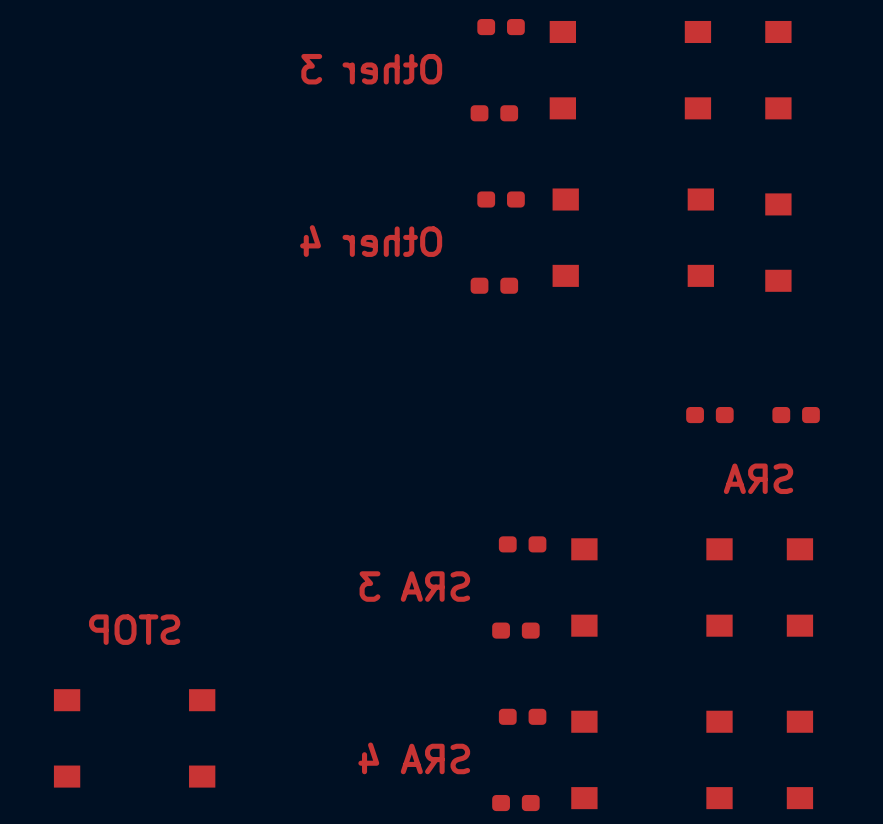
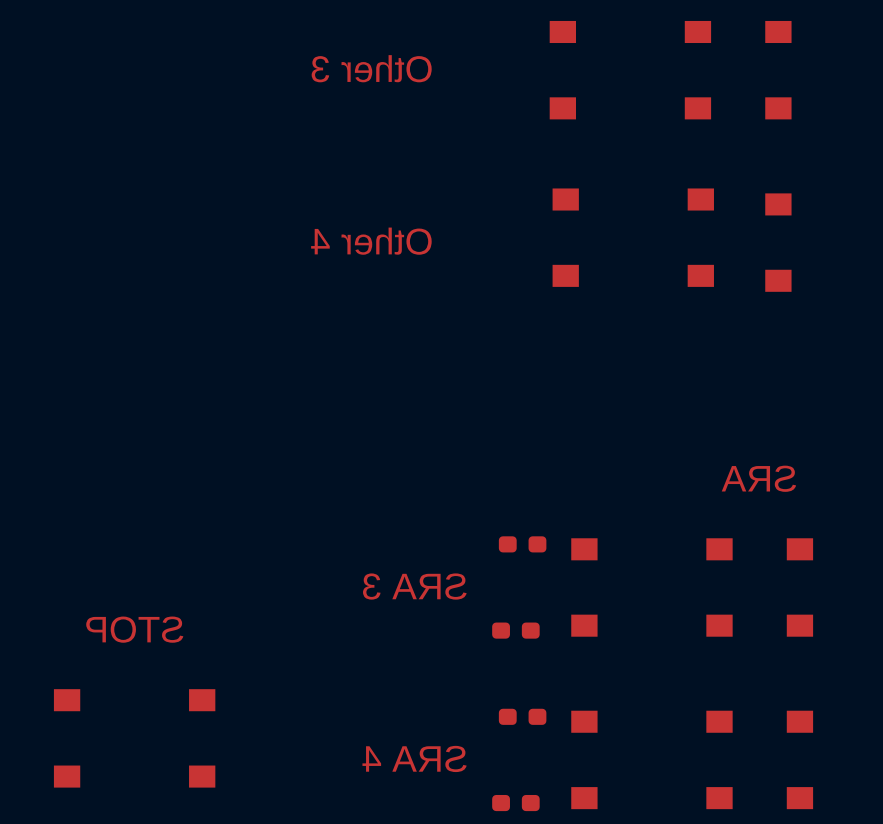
part: (501, 27) -> none
part: (494, 113) -> none
part: (501, 199) -> none
part: (494, 285) -> none
part: (709, 415) -> none
part: (796, 415) -> none

